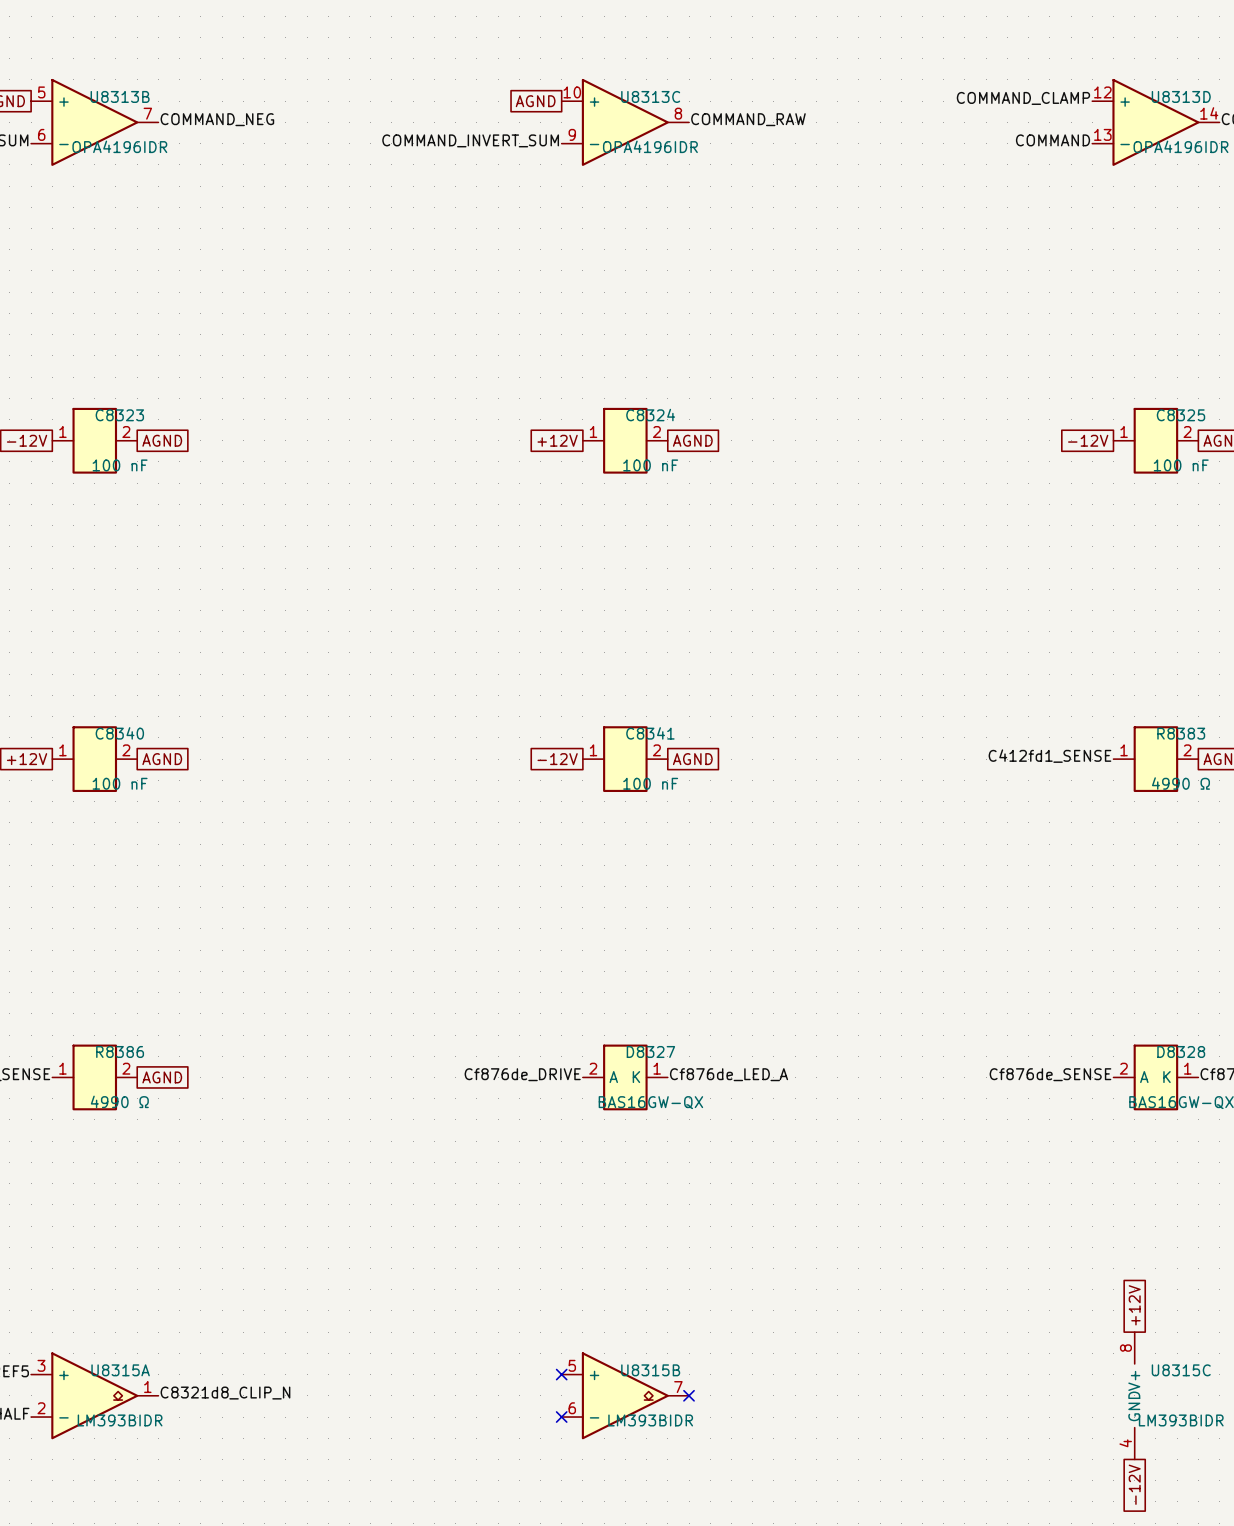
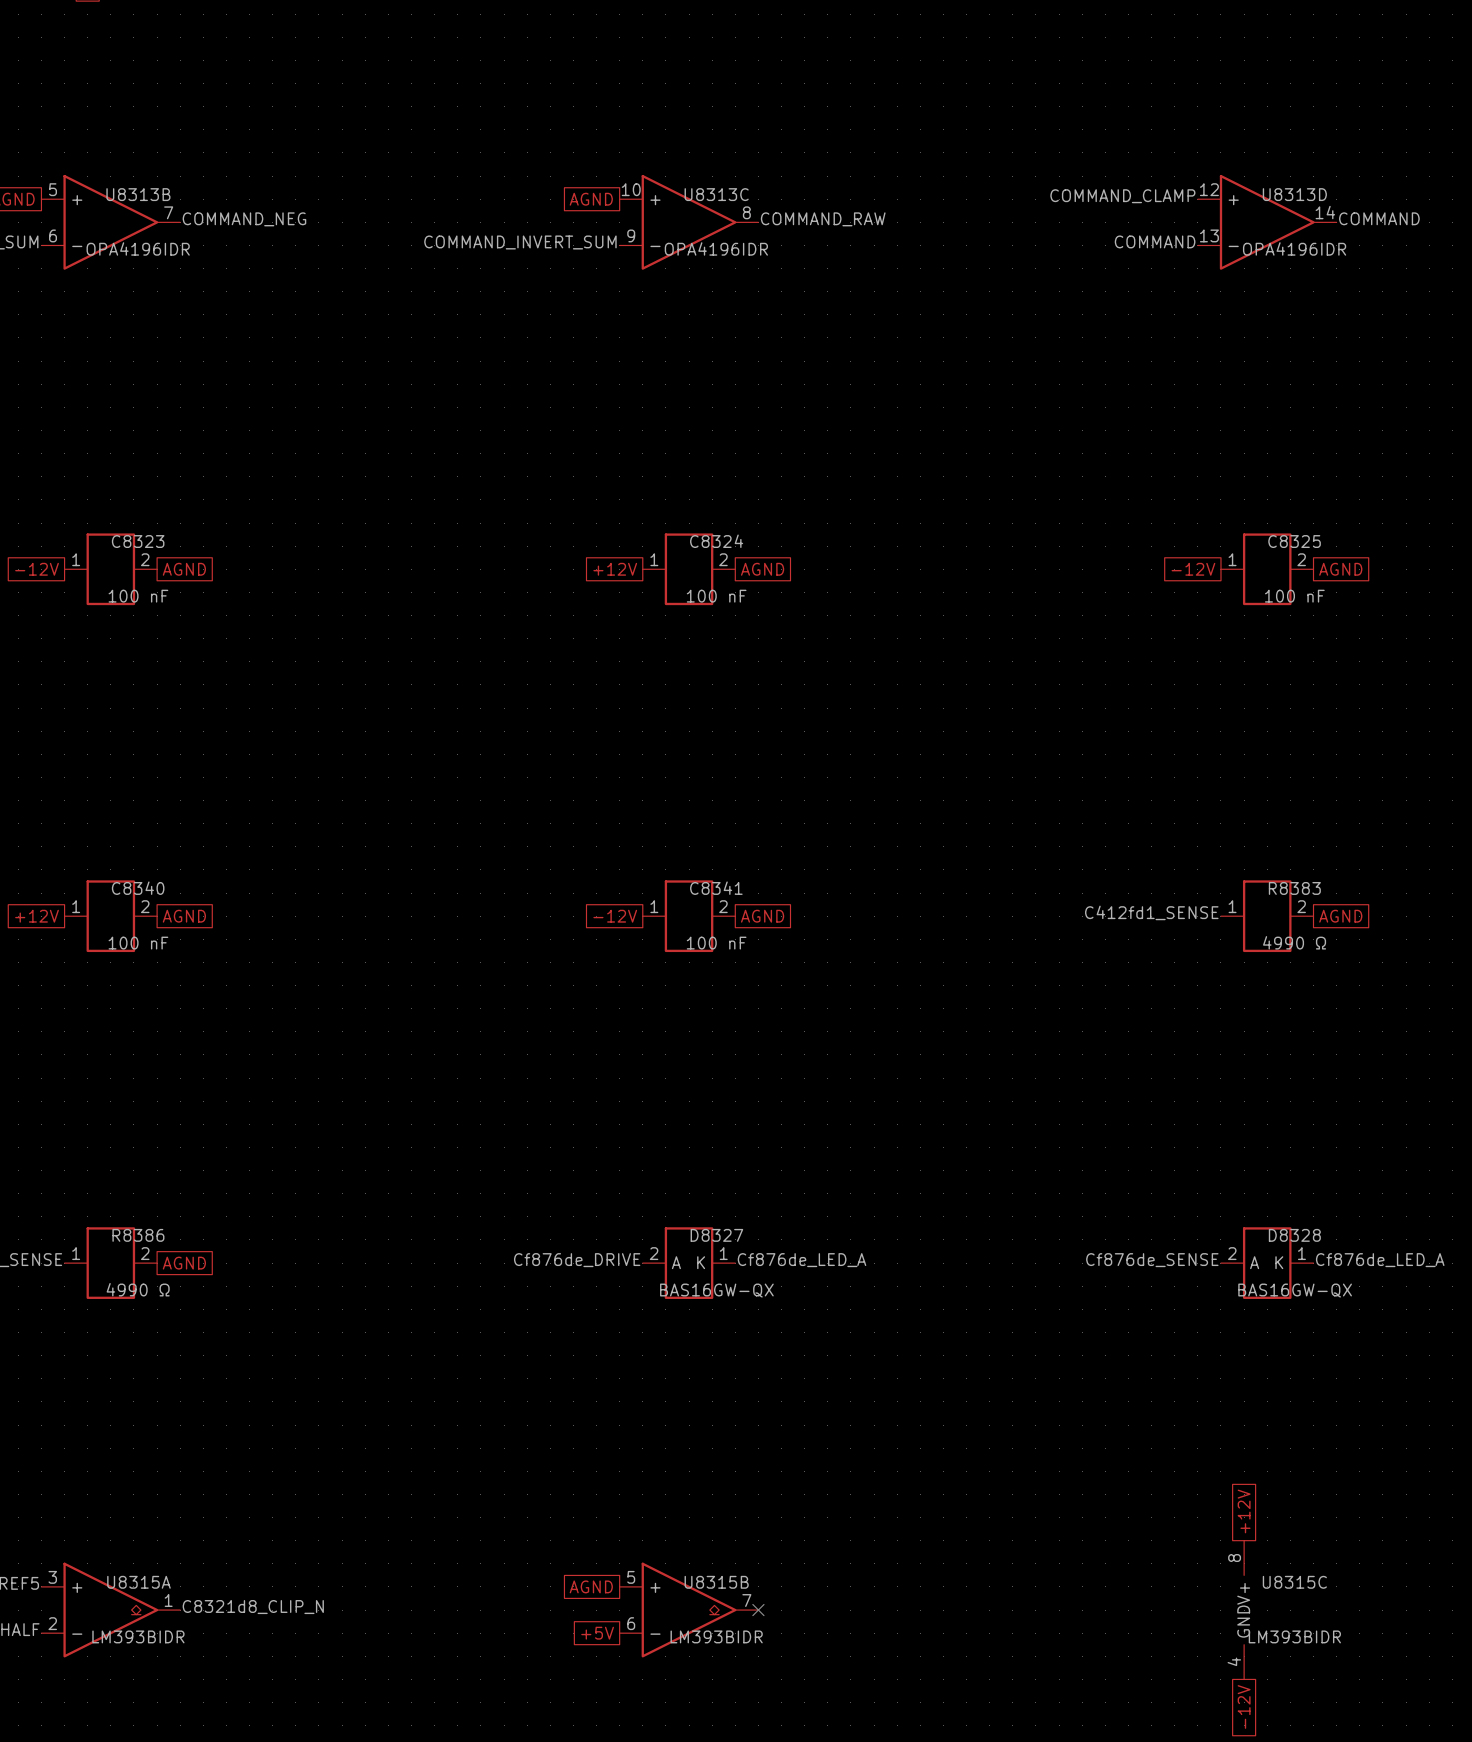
global label: none -> AGND (591, 1586)
no-connect mark: (561, 1374) -> none
global label: none -> +5V (597, 1633)
no-connect mark: (561, 1417) -> none

